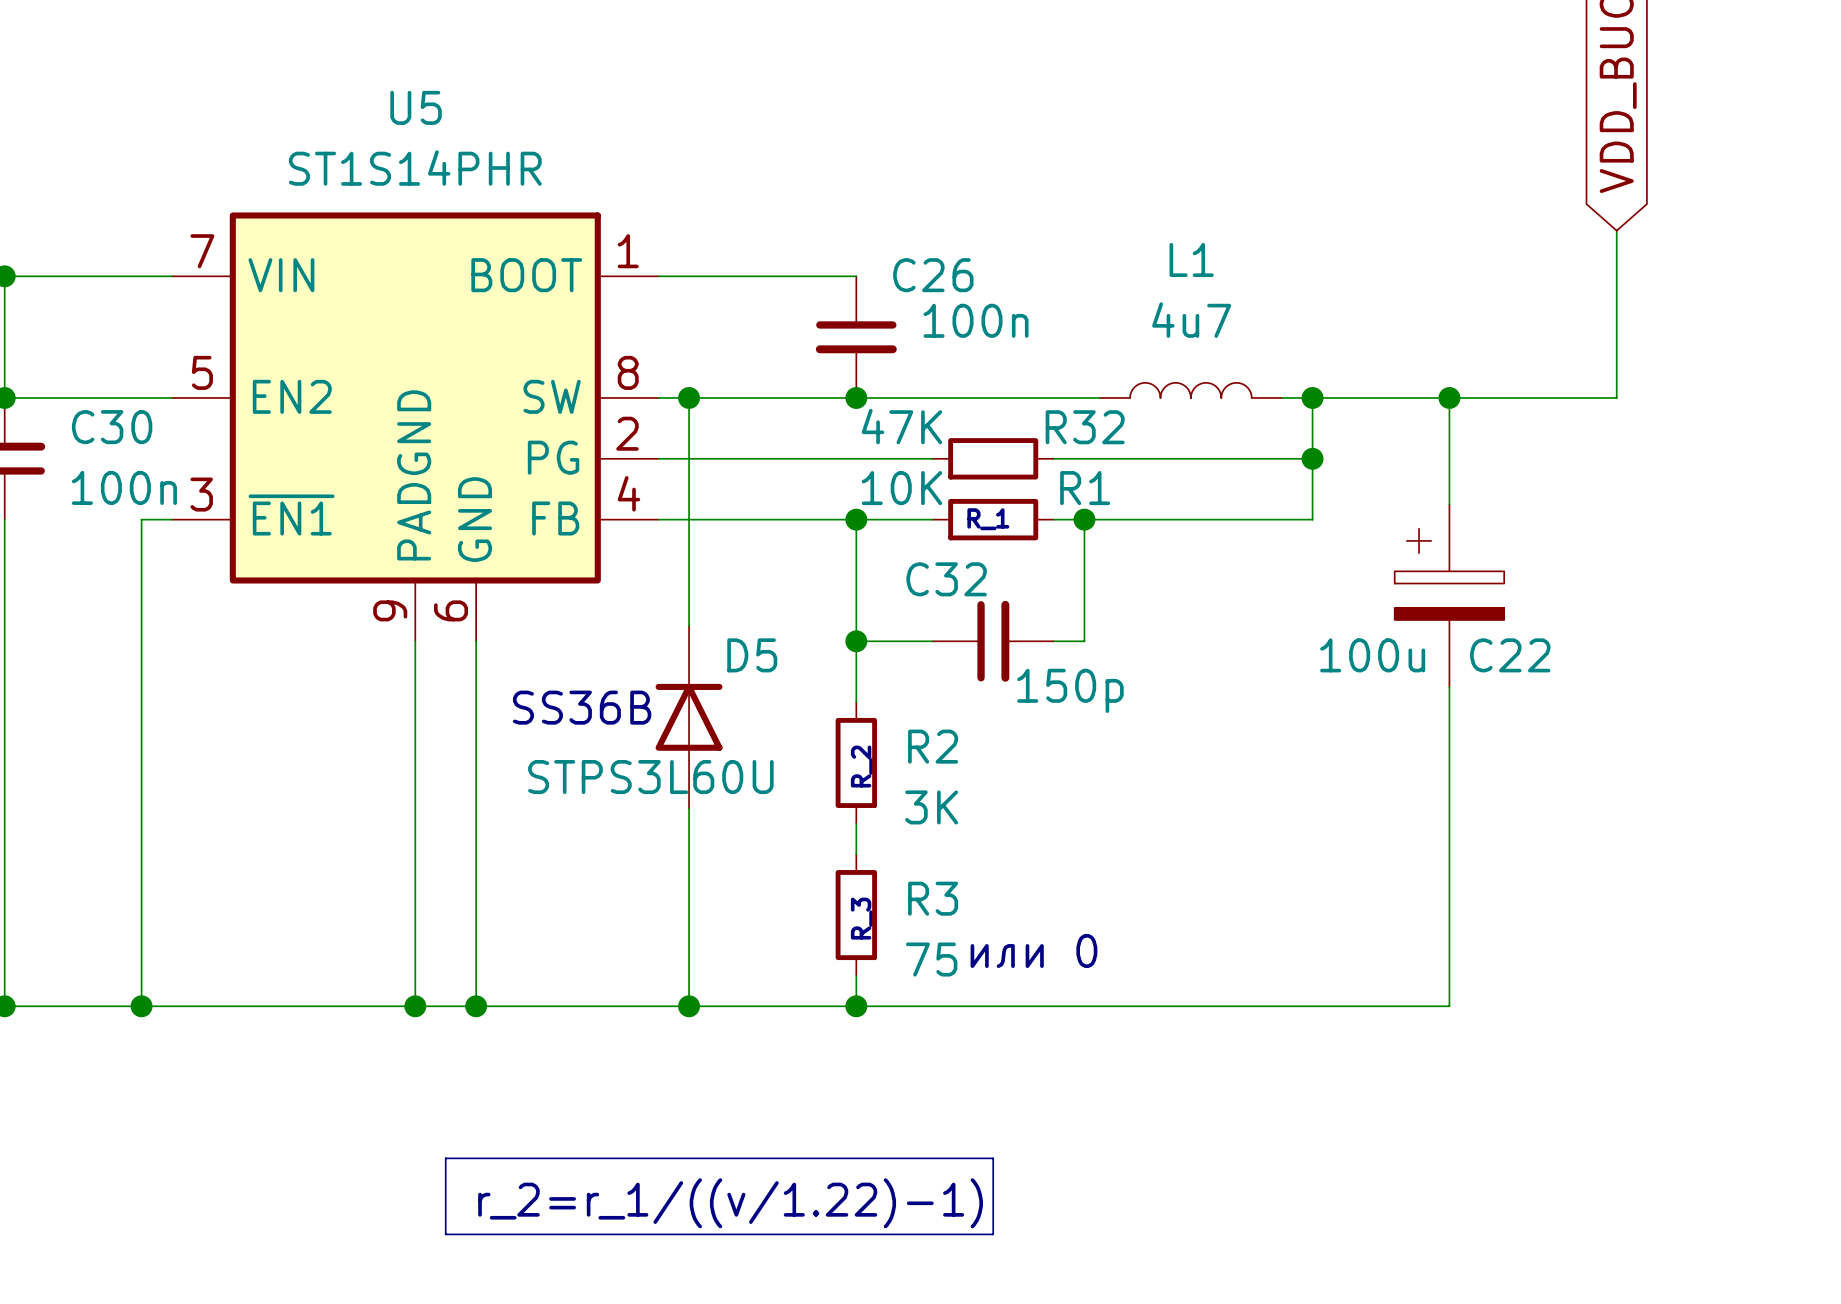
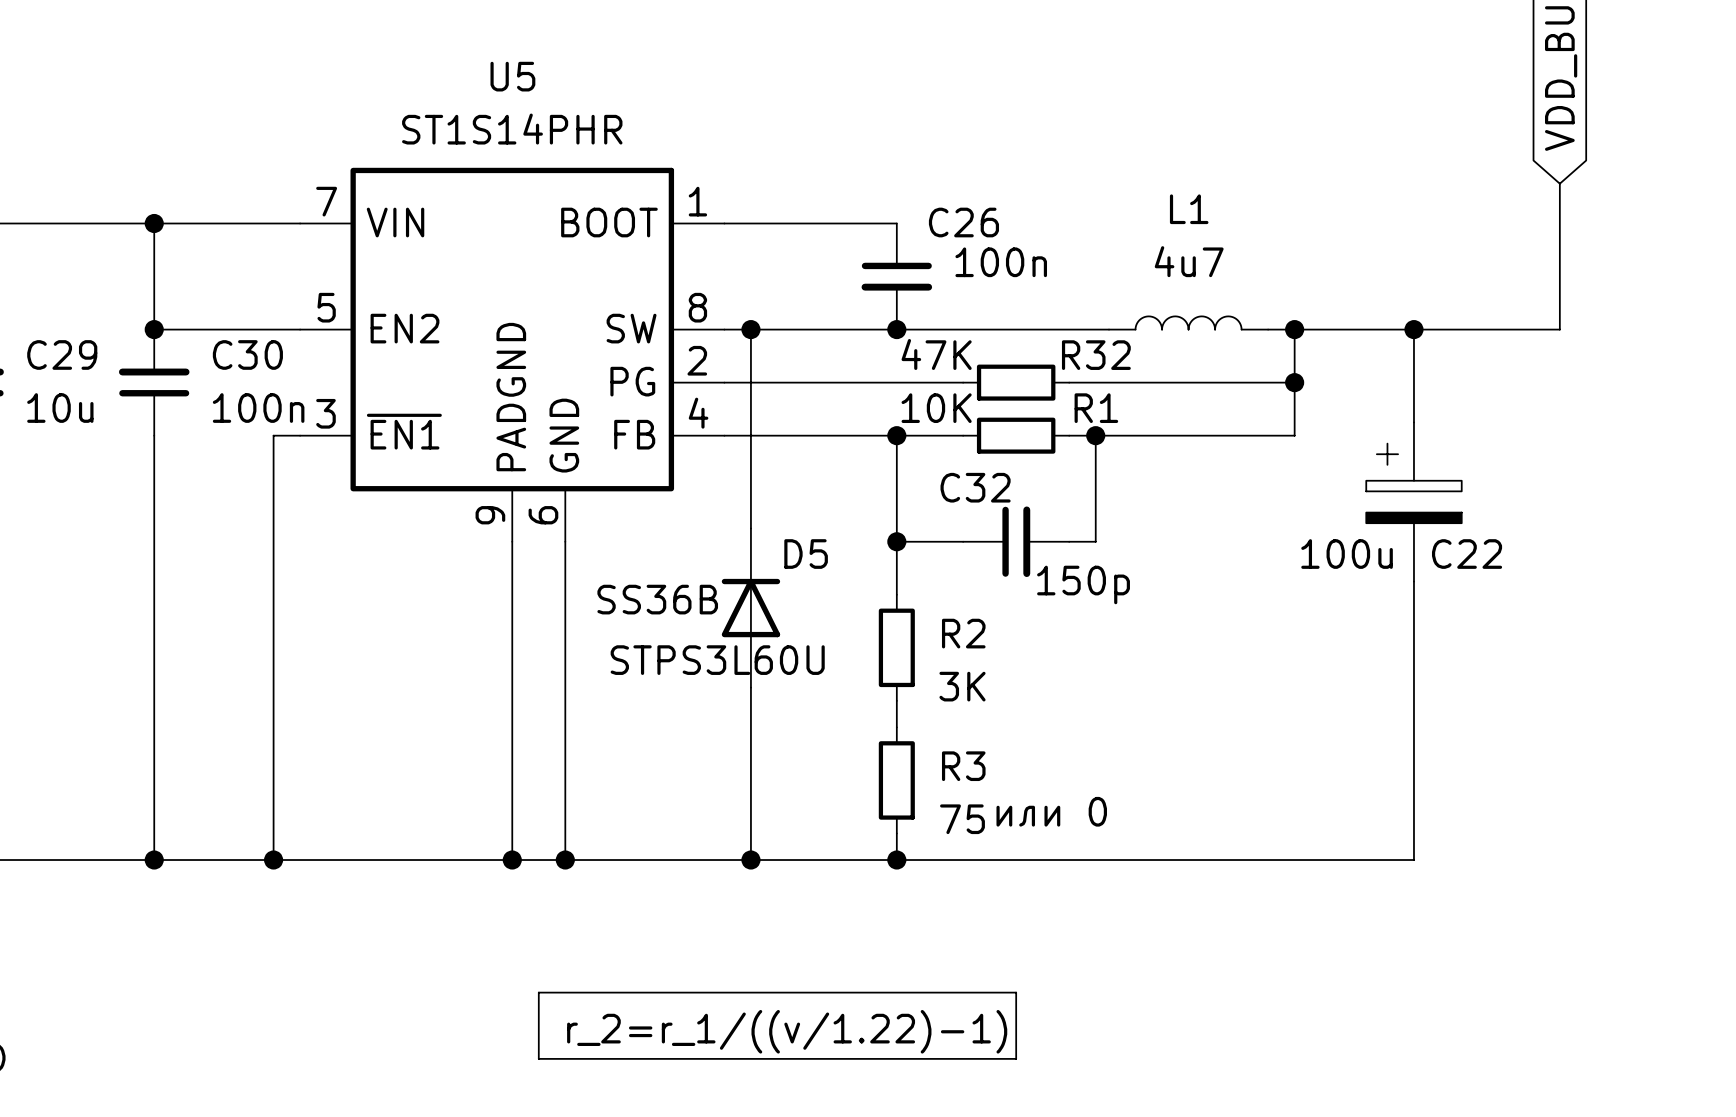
text: R_1 (988, 519) -> none
text: R_2 (861, 766) -> none
text: R_3 (861, 918) -> none

